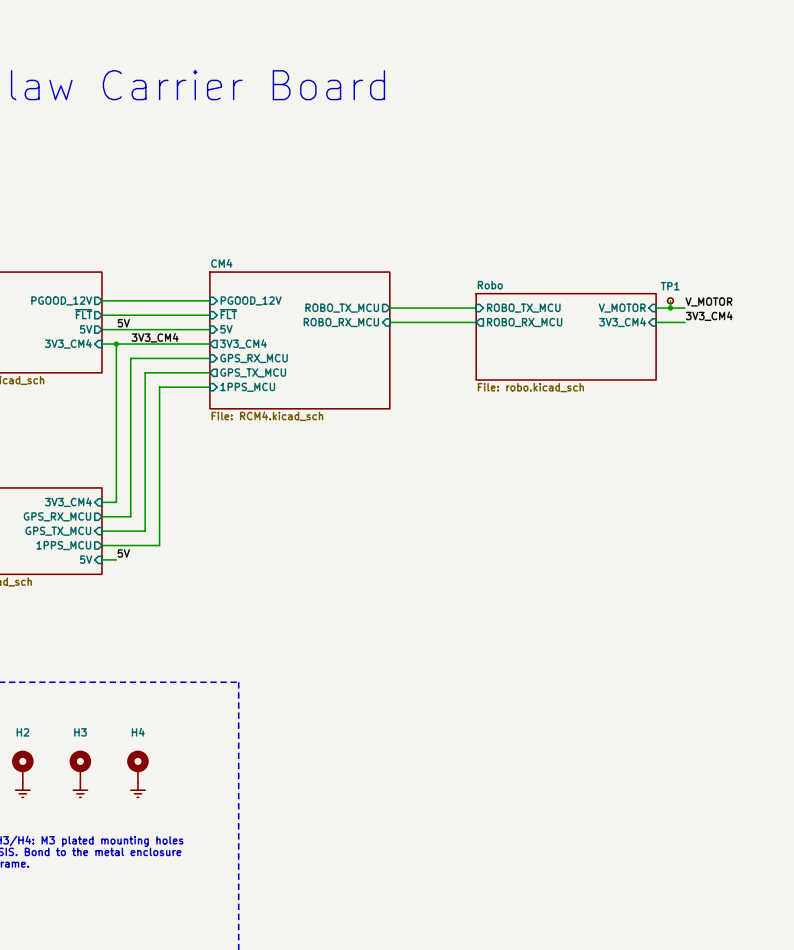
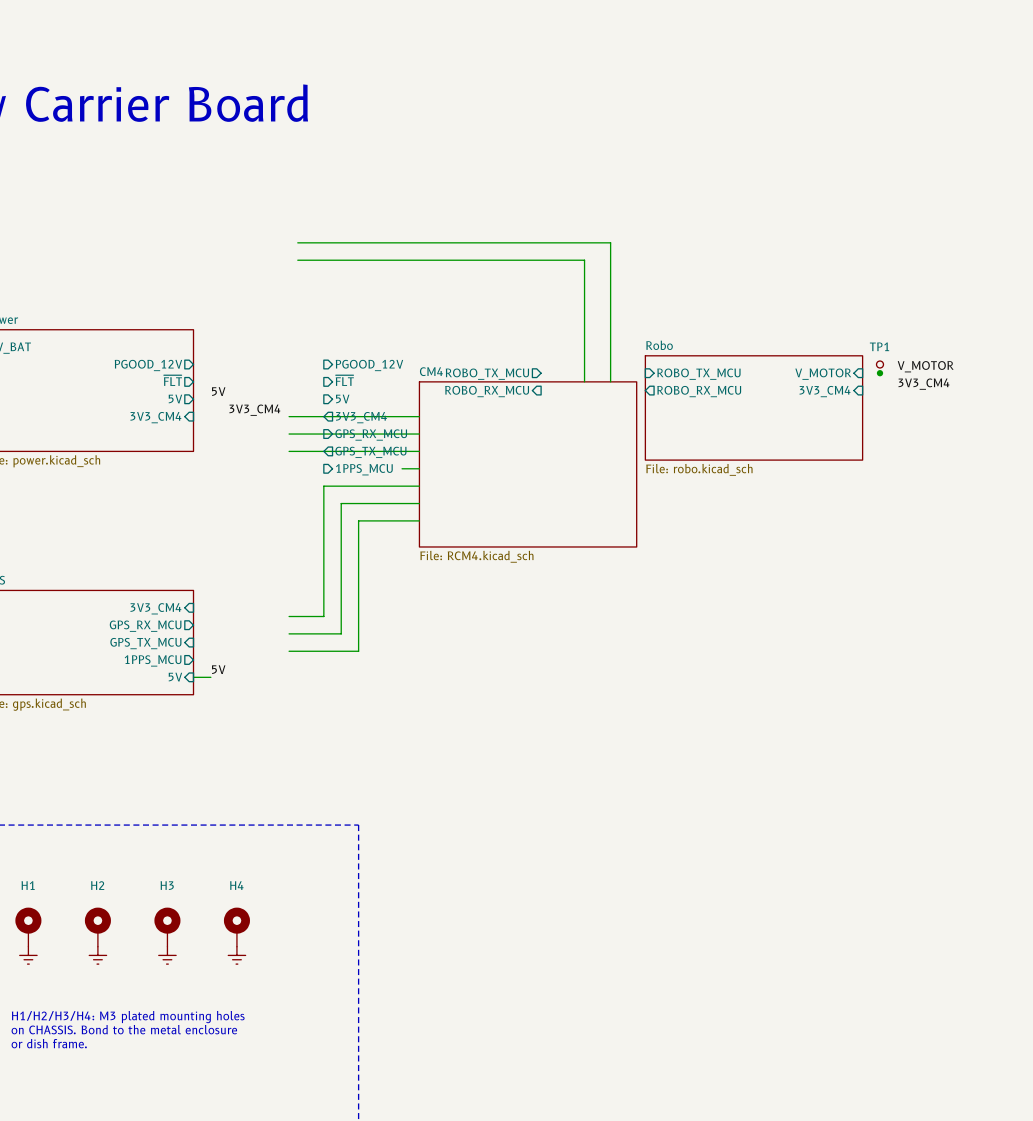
wire: none -> (297, 242) (610, 242) (610, 381)
wire: none -> (297, 260) (584, 260) (584, 381)
wire: (101, 300) (209, 300) -> none
wire: (670, 300) (670, 308) -> none
wire: (389, 308) (476, 308) -> none
wire: (656, 308) (684, 308) -> none
wire: (101, 315) (209, 315) -> none
wire: (389, 322) (476, 322) -> none
wire: (656, 322) (684, 322) -> none
wire: (101, 329) (209, 329) -> none
sheet CM4 position: (299, 340) -> (528, 464)
wire: (101, 344) (181, 344) -> (323, 416) (419, 416)
wire: (116, 344) (116, 502) (101, 502) -> none
junction: (116, 344) -> none
wire: (181, 358) (130, 358) (130, 516) (101, 516) -> none
wire: none -> (323, 434) (419, 434)
wire: (181, 372) (145, 372) (145, 531) (101, 531) -> none
wire: none -> (323, 451) (419, 451)
wire: (209, 387) (159, 387) (159, 545) (101, 545) -> none
wire: none -> (402, 468) (419, 468)
wire: none -> (419, 486) (323, 486) (323, 616) (289, 616)
wire: none -> (419, 503) (341, 503) (341, 633) (289, 633)
wire: none -> (419, 520) (358, 520) (358, 651) (289, 651)

